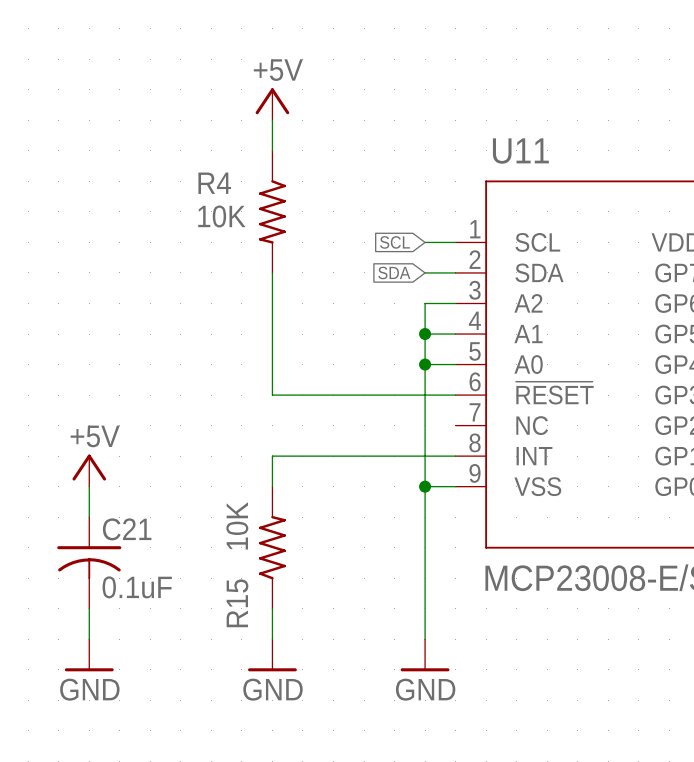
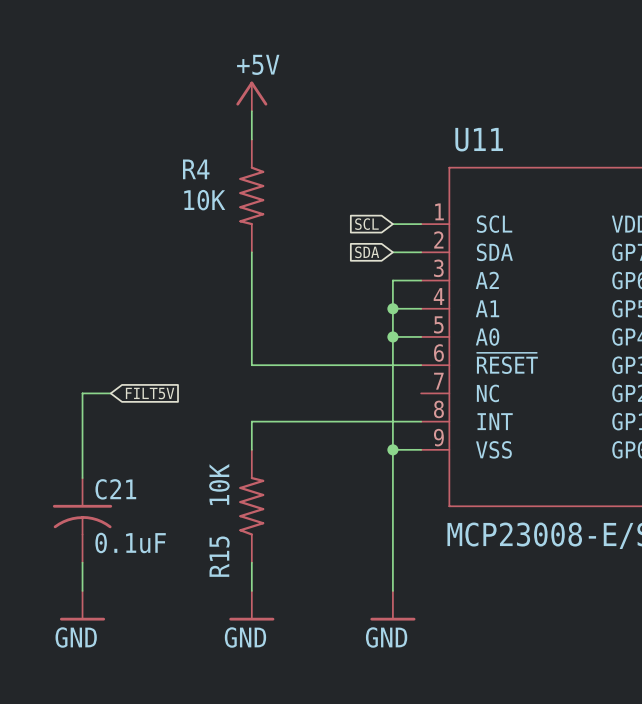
wire: none -> (110, 393) (82, 393) (82, 449)
global label: none -> FILT5V (150, 393)
power symbol: +5V (89, 470) -> none

